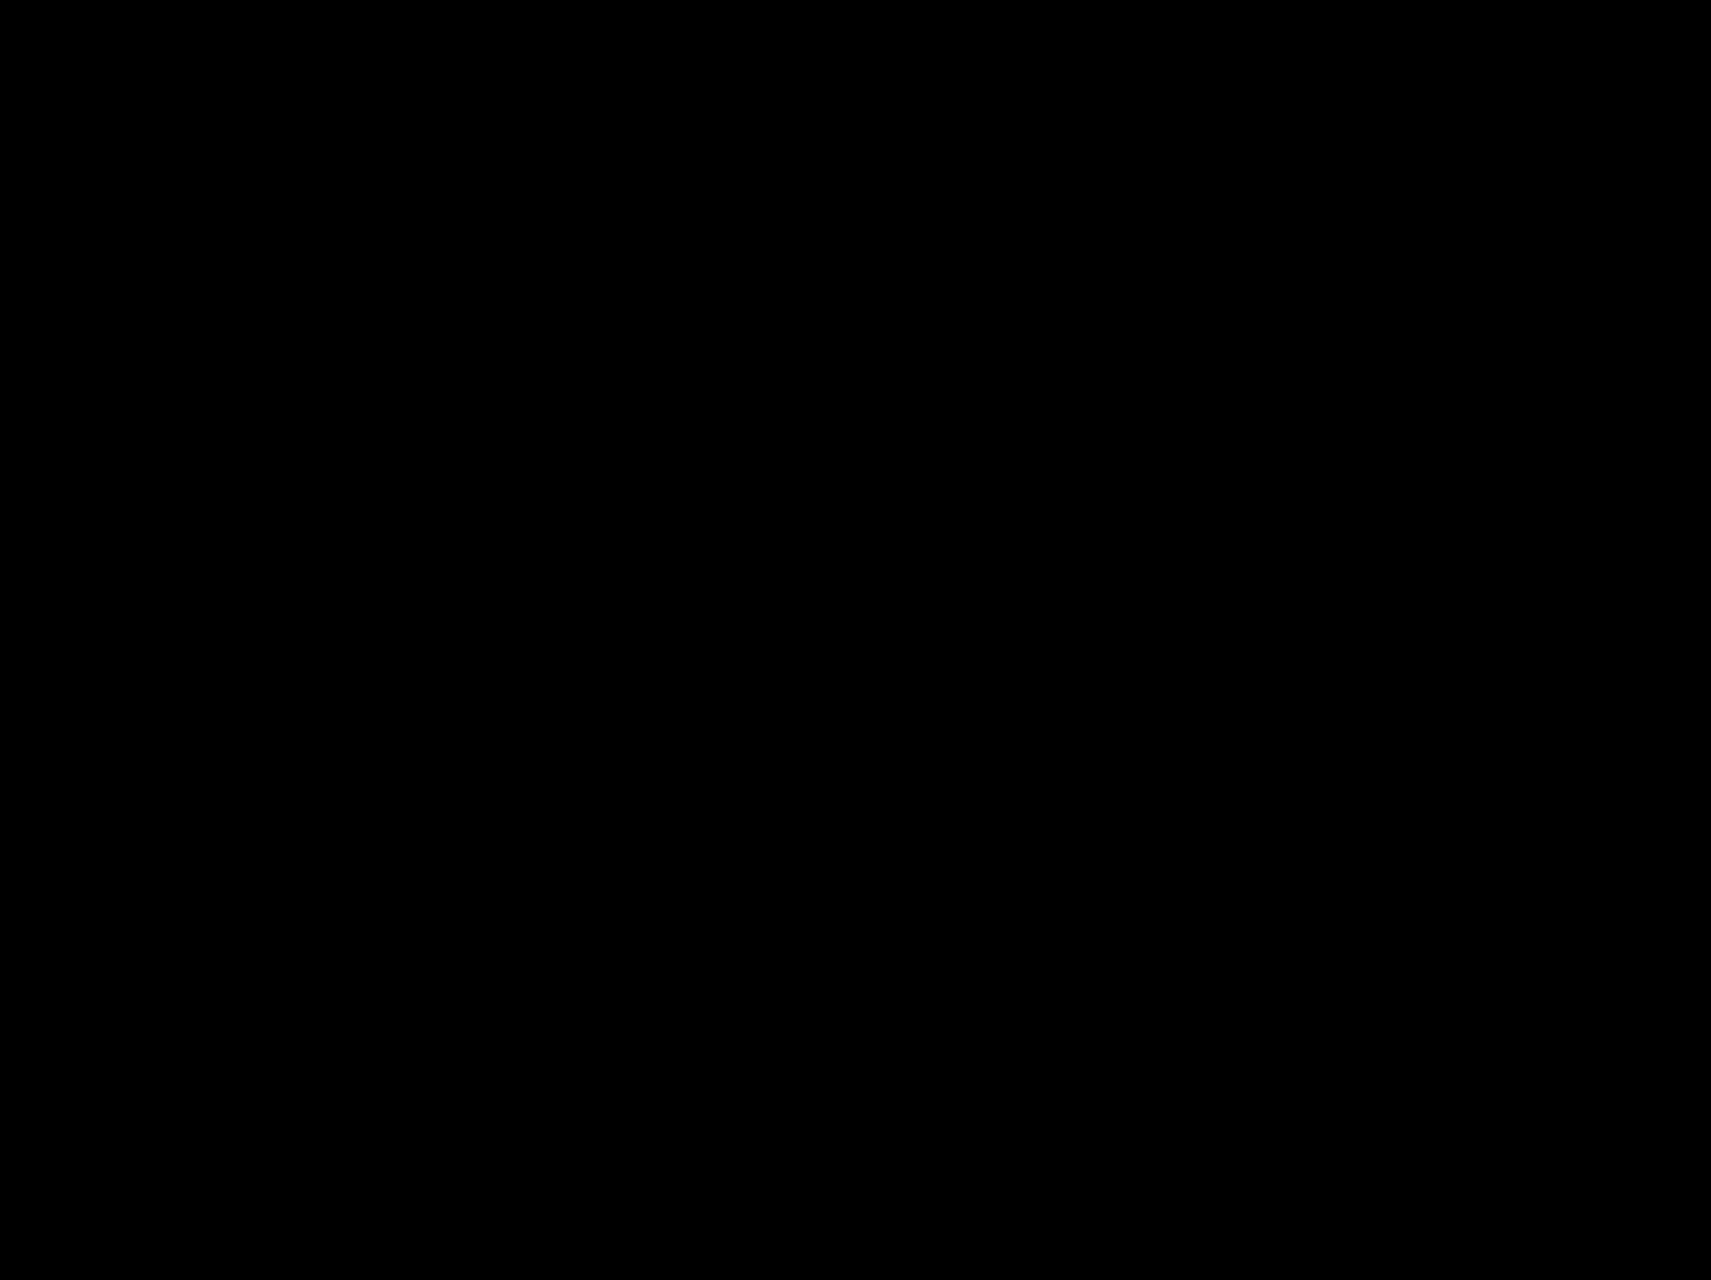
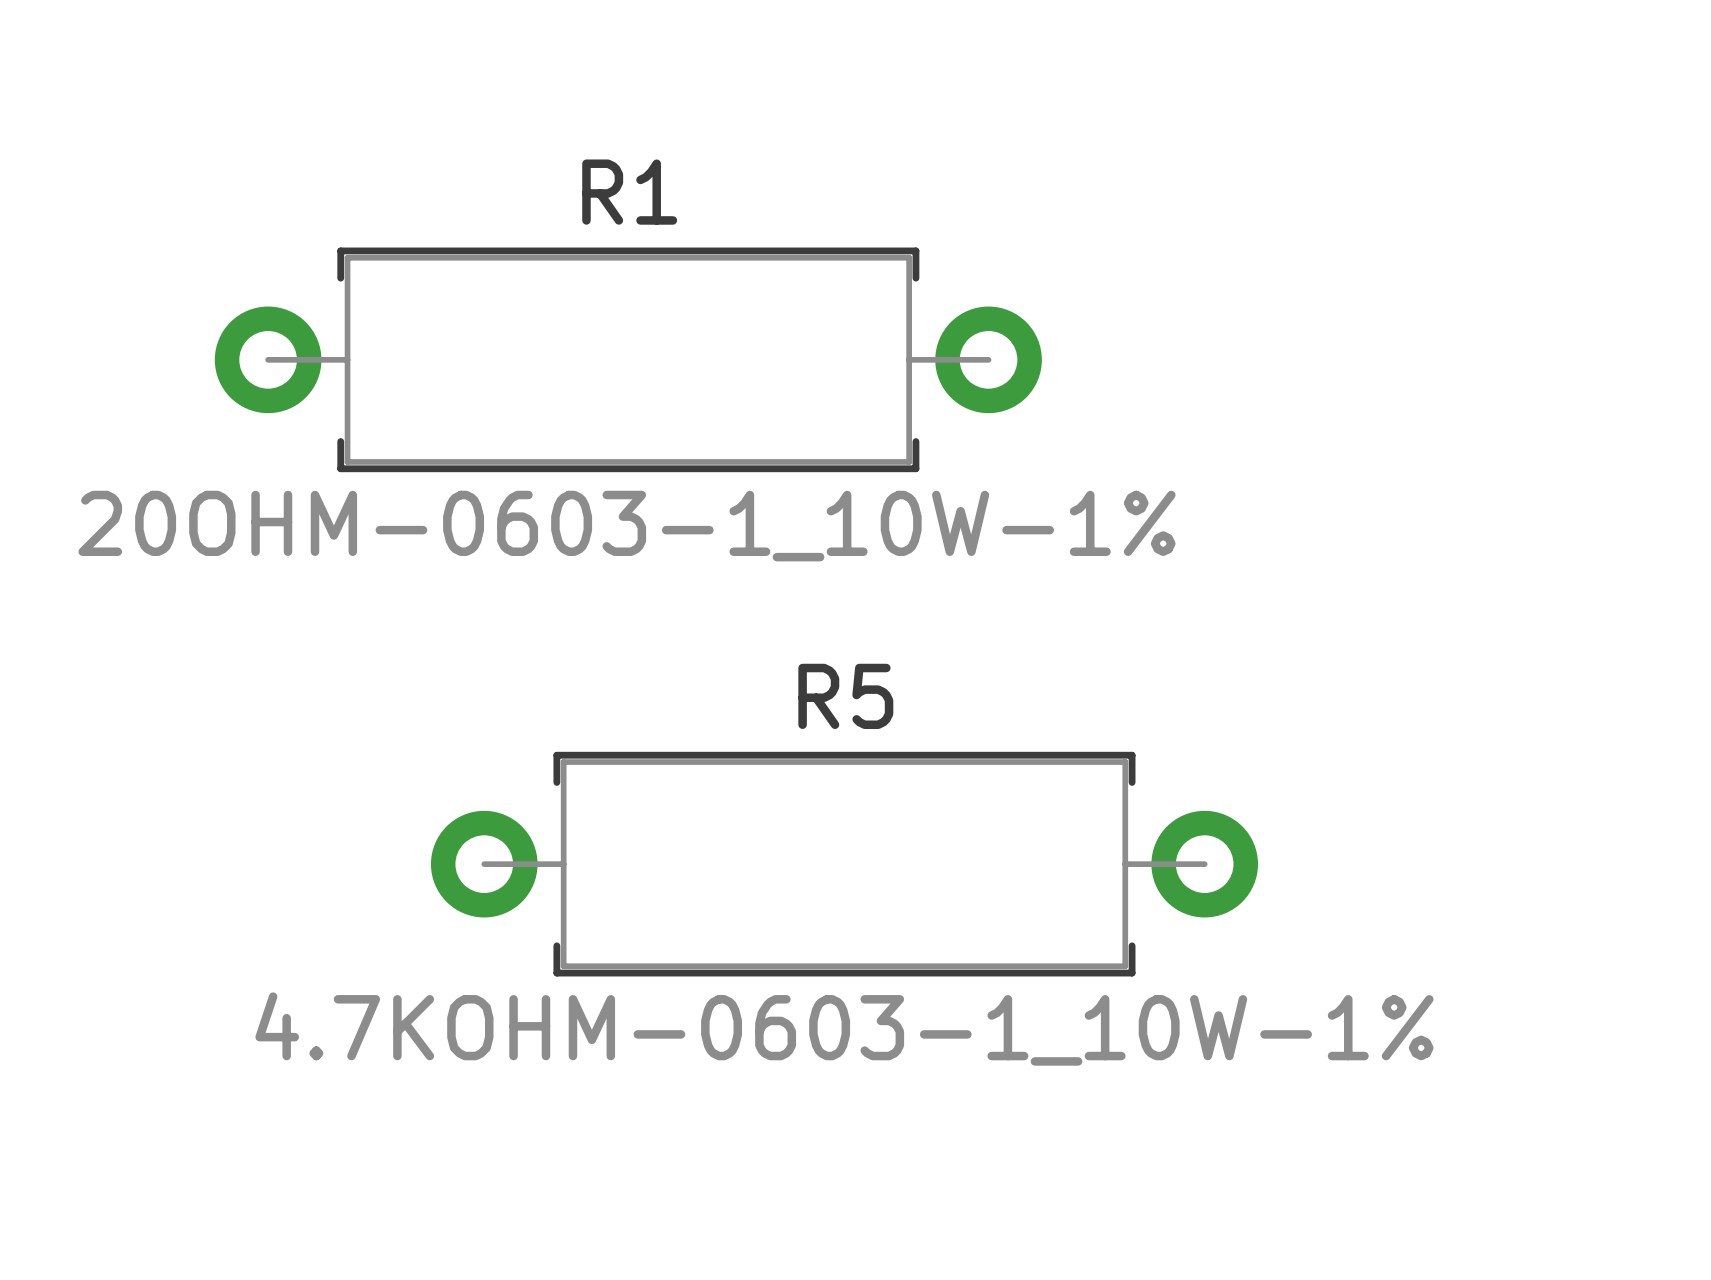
R1: none -> 20OHM-0603-1_10W-1% (628, 359)
R5: none -> 4.7KOHM-0603-1_10W-1% (844, 864)

